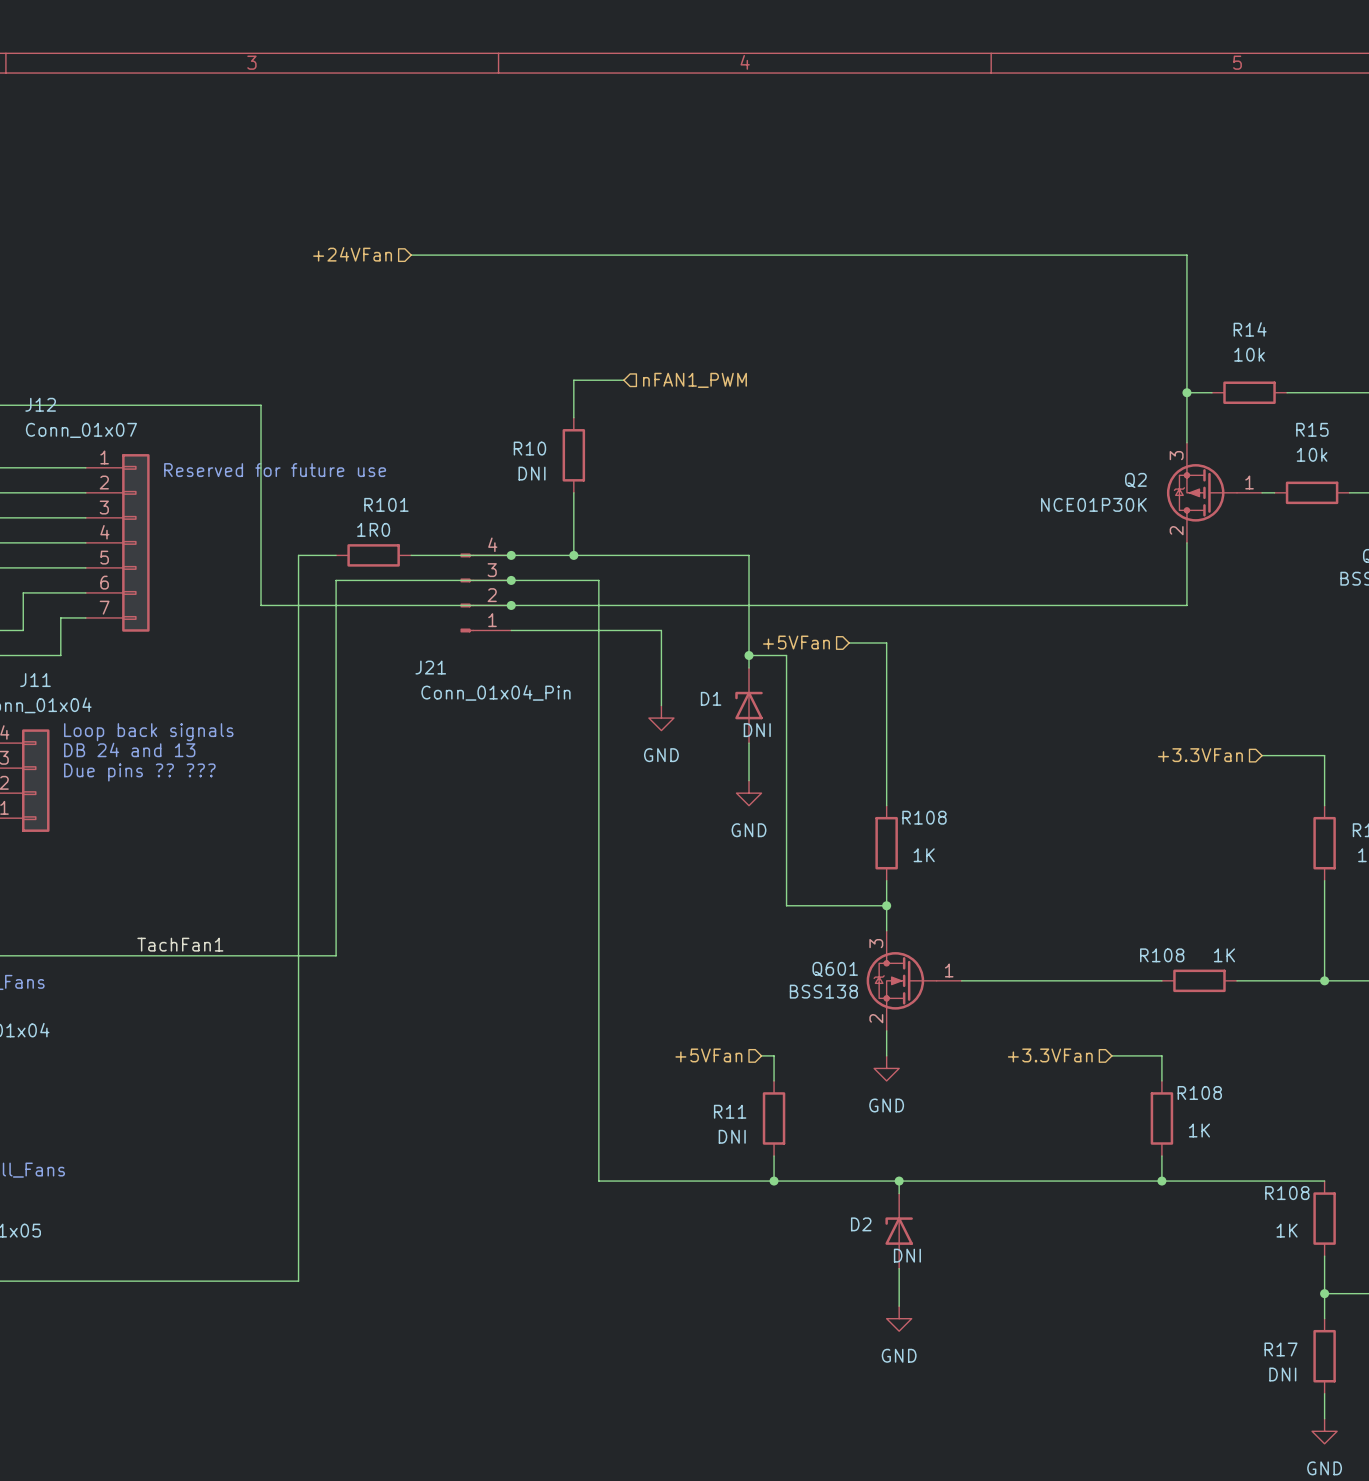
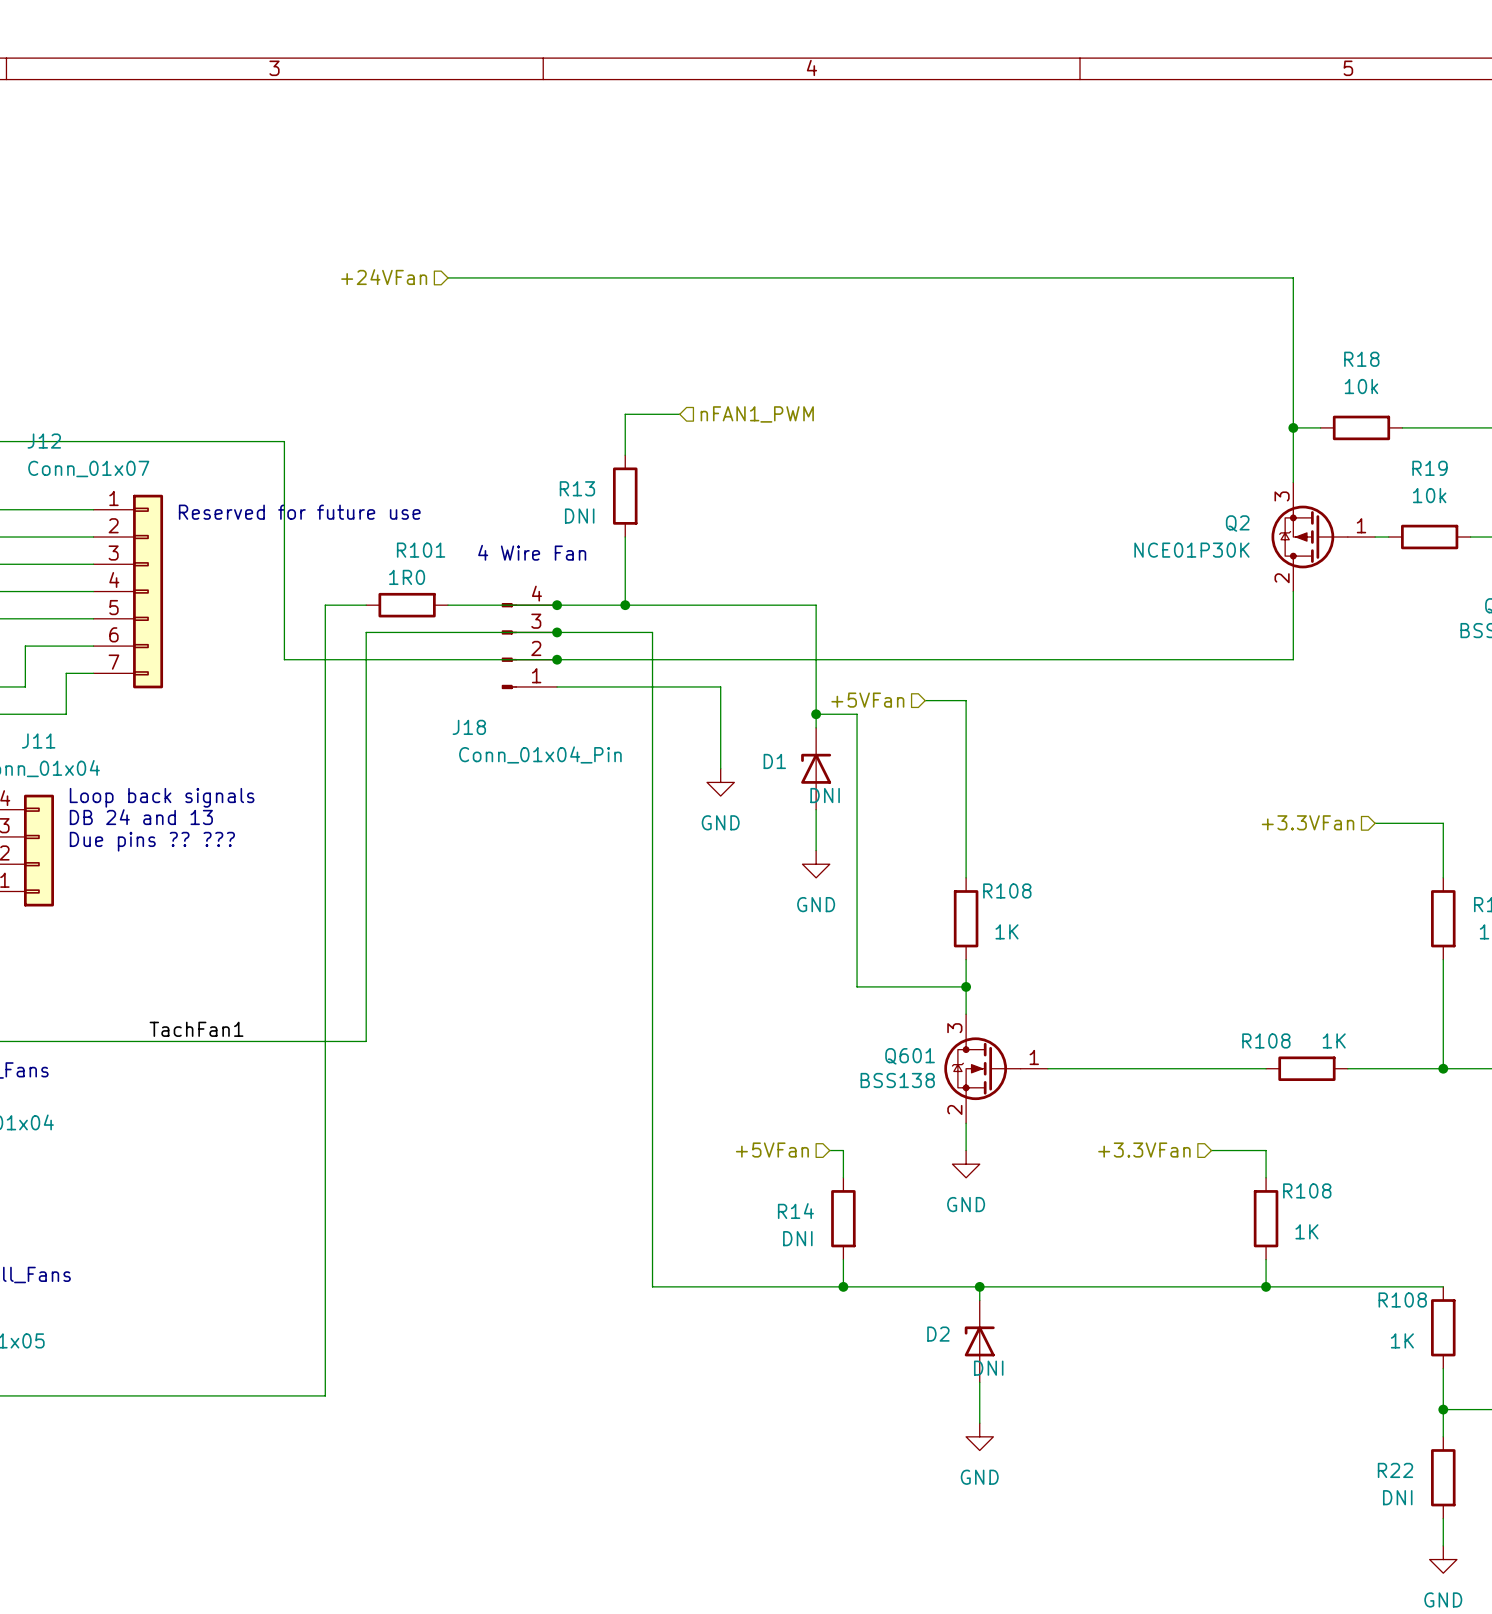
R14 name: R14 (1250, 329) -> R18 (1361, 359)
R15 name: R15 (1312, 429) -> R19 (1429, 468)
R10 name: R10 (529, 448) -> R13 (577, 488)
text: none -> 4 Wire Fan (532, 552)
J21 name: J21 (430, 667) -> J18 (469, 727)
R11 name: R11 (730, 1111) -> R14 (795, 1211)
R17 name: R17 (1281, 1349) -> R22 (1395, 1470)

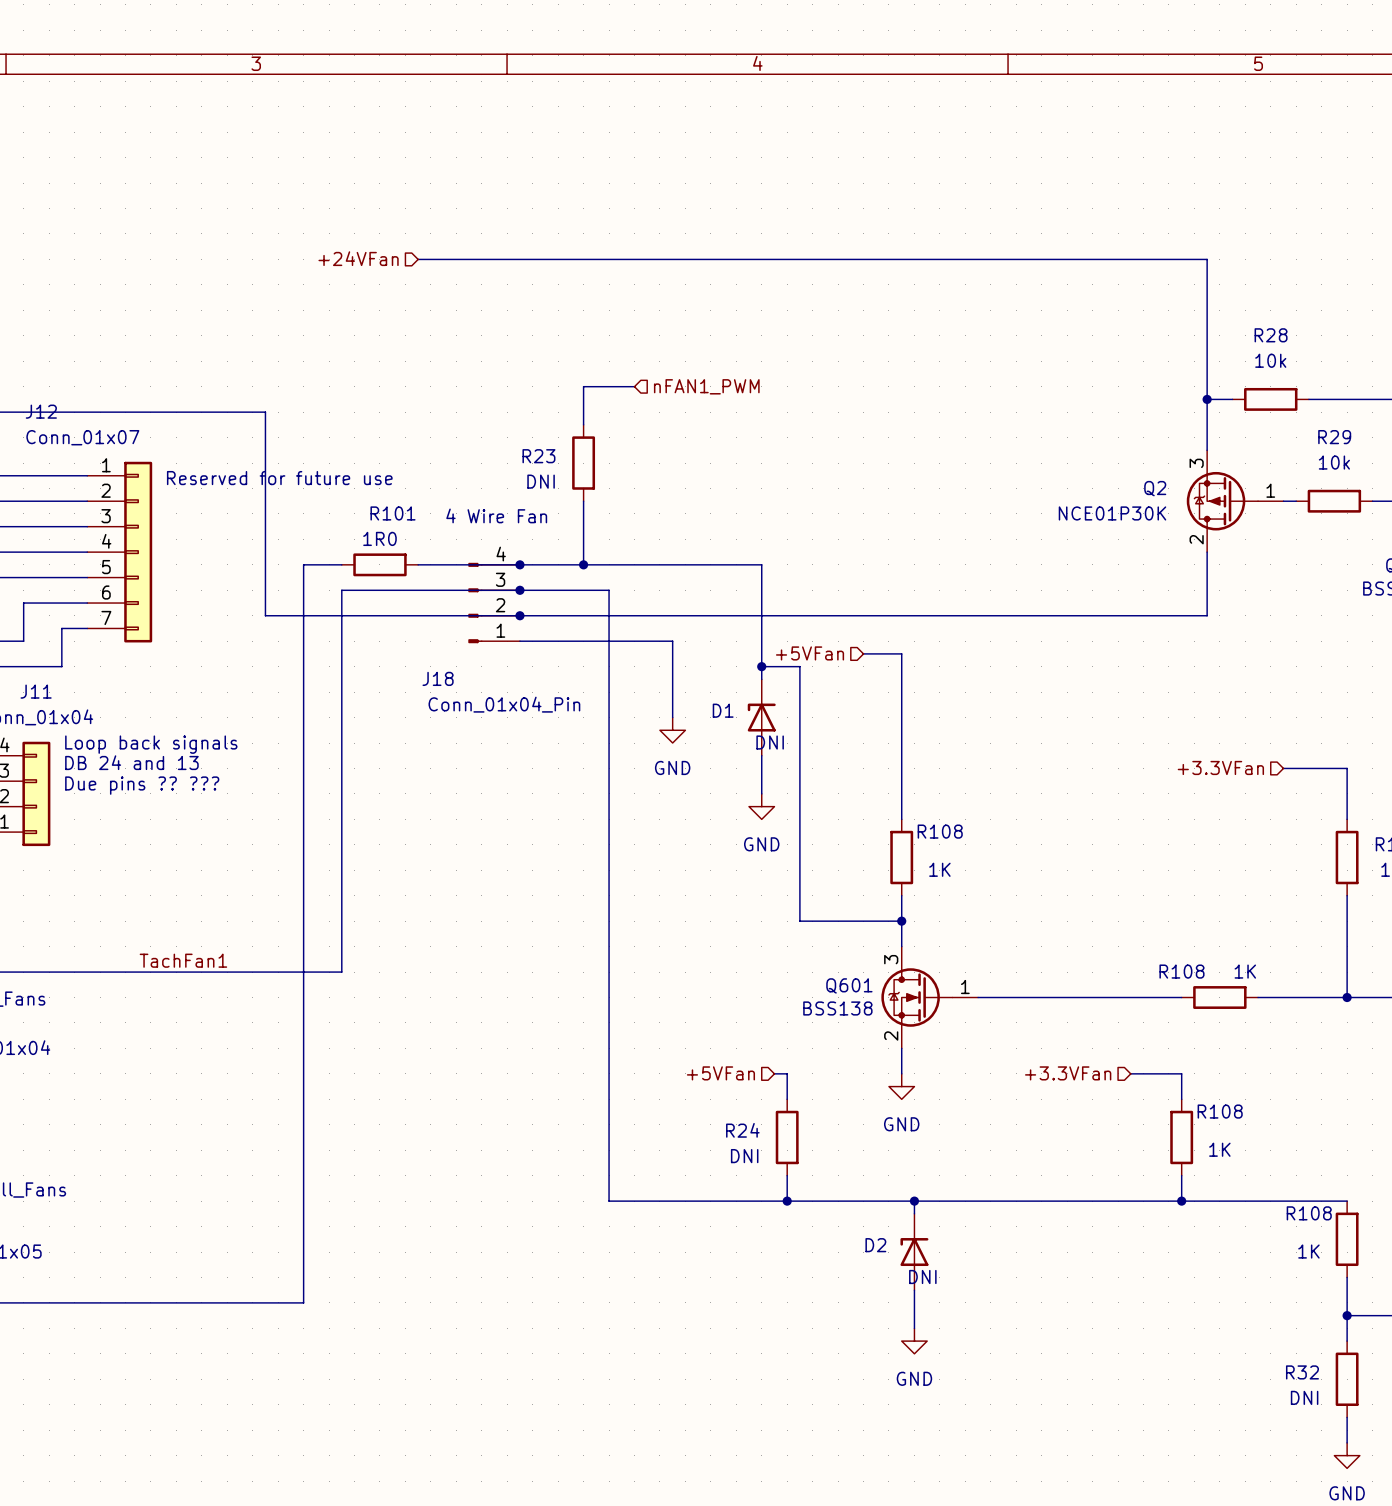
R18 name: R18 (1361, 359) -> R28 (1271, 335)
R19 name: R19 (1429, 468) -> R29 (1334, 437)
R13 name: R13 (577, 488) -> R23 (538, 456)
R14 name: R14 (795, 1211) -> R24 (742, 1130)
R22 name: R22 (1395, 1470) -> R32 (1302, 1372)

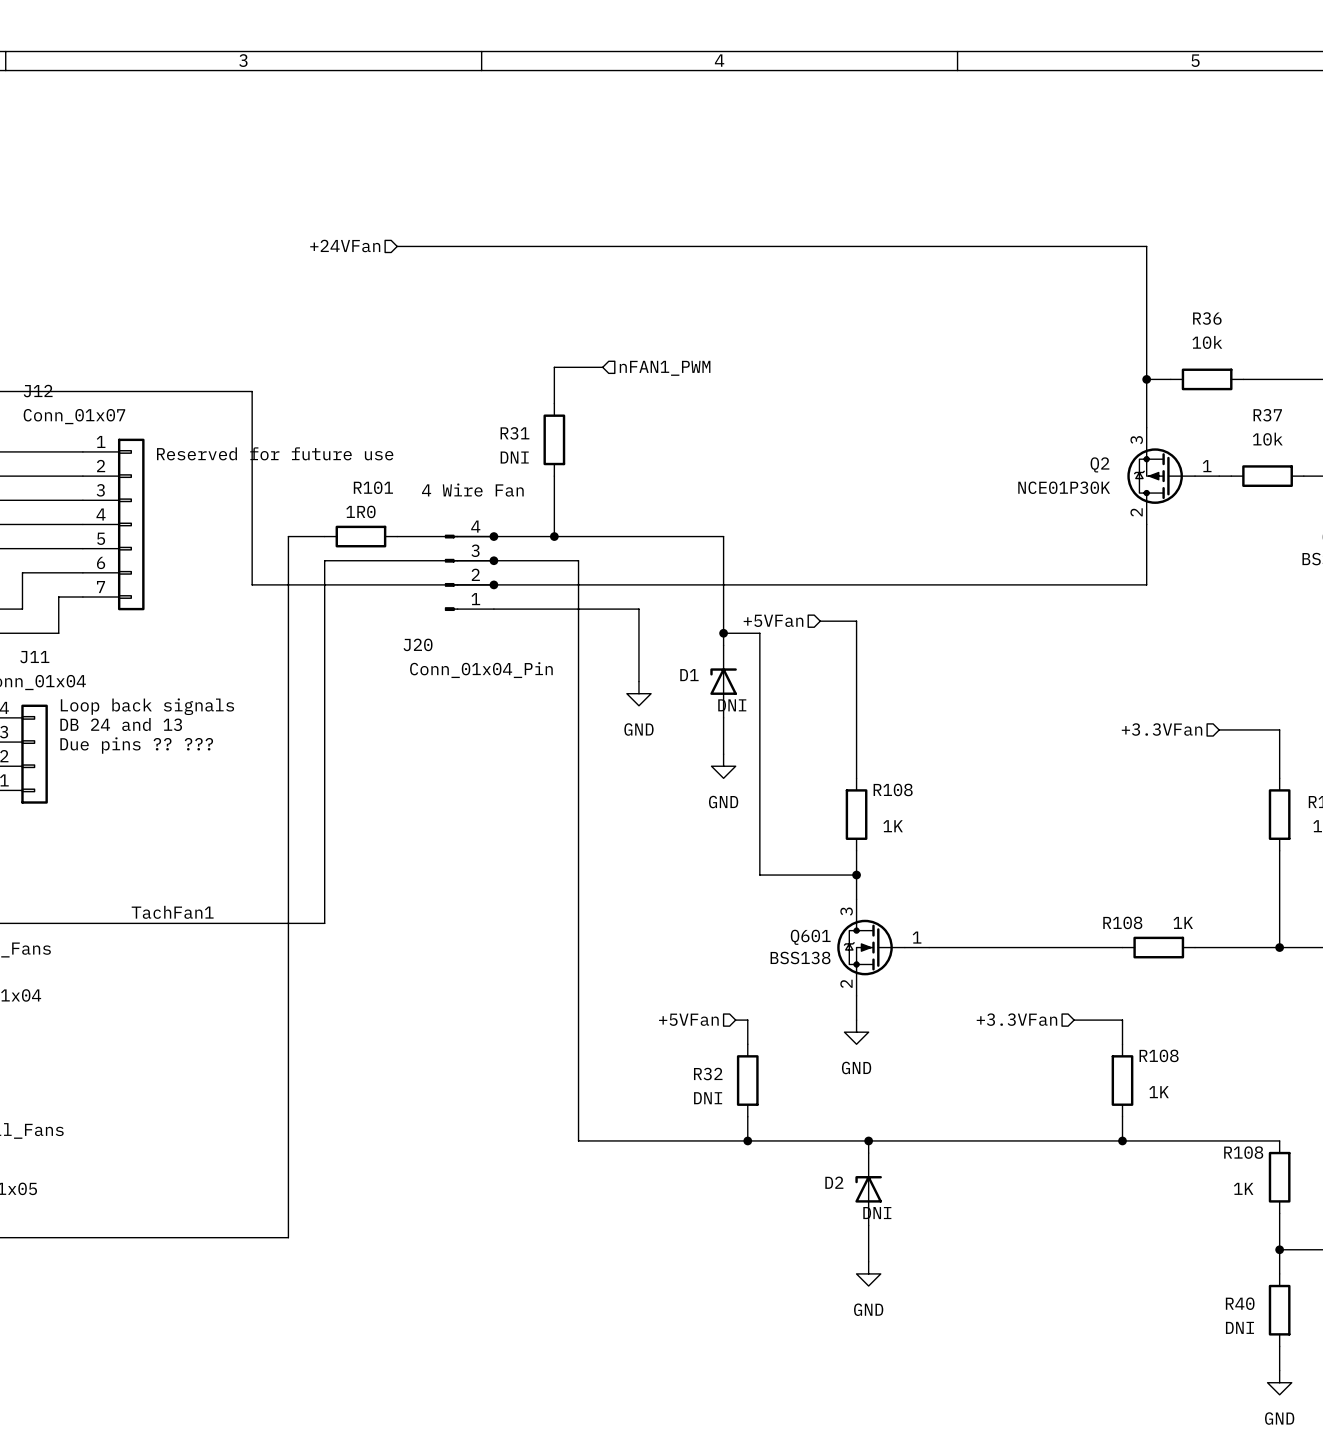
R28 name: R28 (1271, 335) -> R36 (1207, 318)
R29 name: R29 (1334, 437) -> R37 (1267, 415)
R23 name: R23 (538, 456) -> R31 (514, 433)
J18 name: J18 (438, 678) -> J20 (418, 644)
R24 name: R24 (742, 1130) -> R32 (708, 1074)
R32 name: R32 (1302, 1372) -> R40 (1240, 1303)

